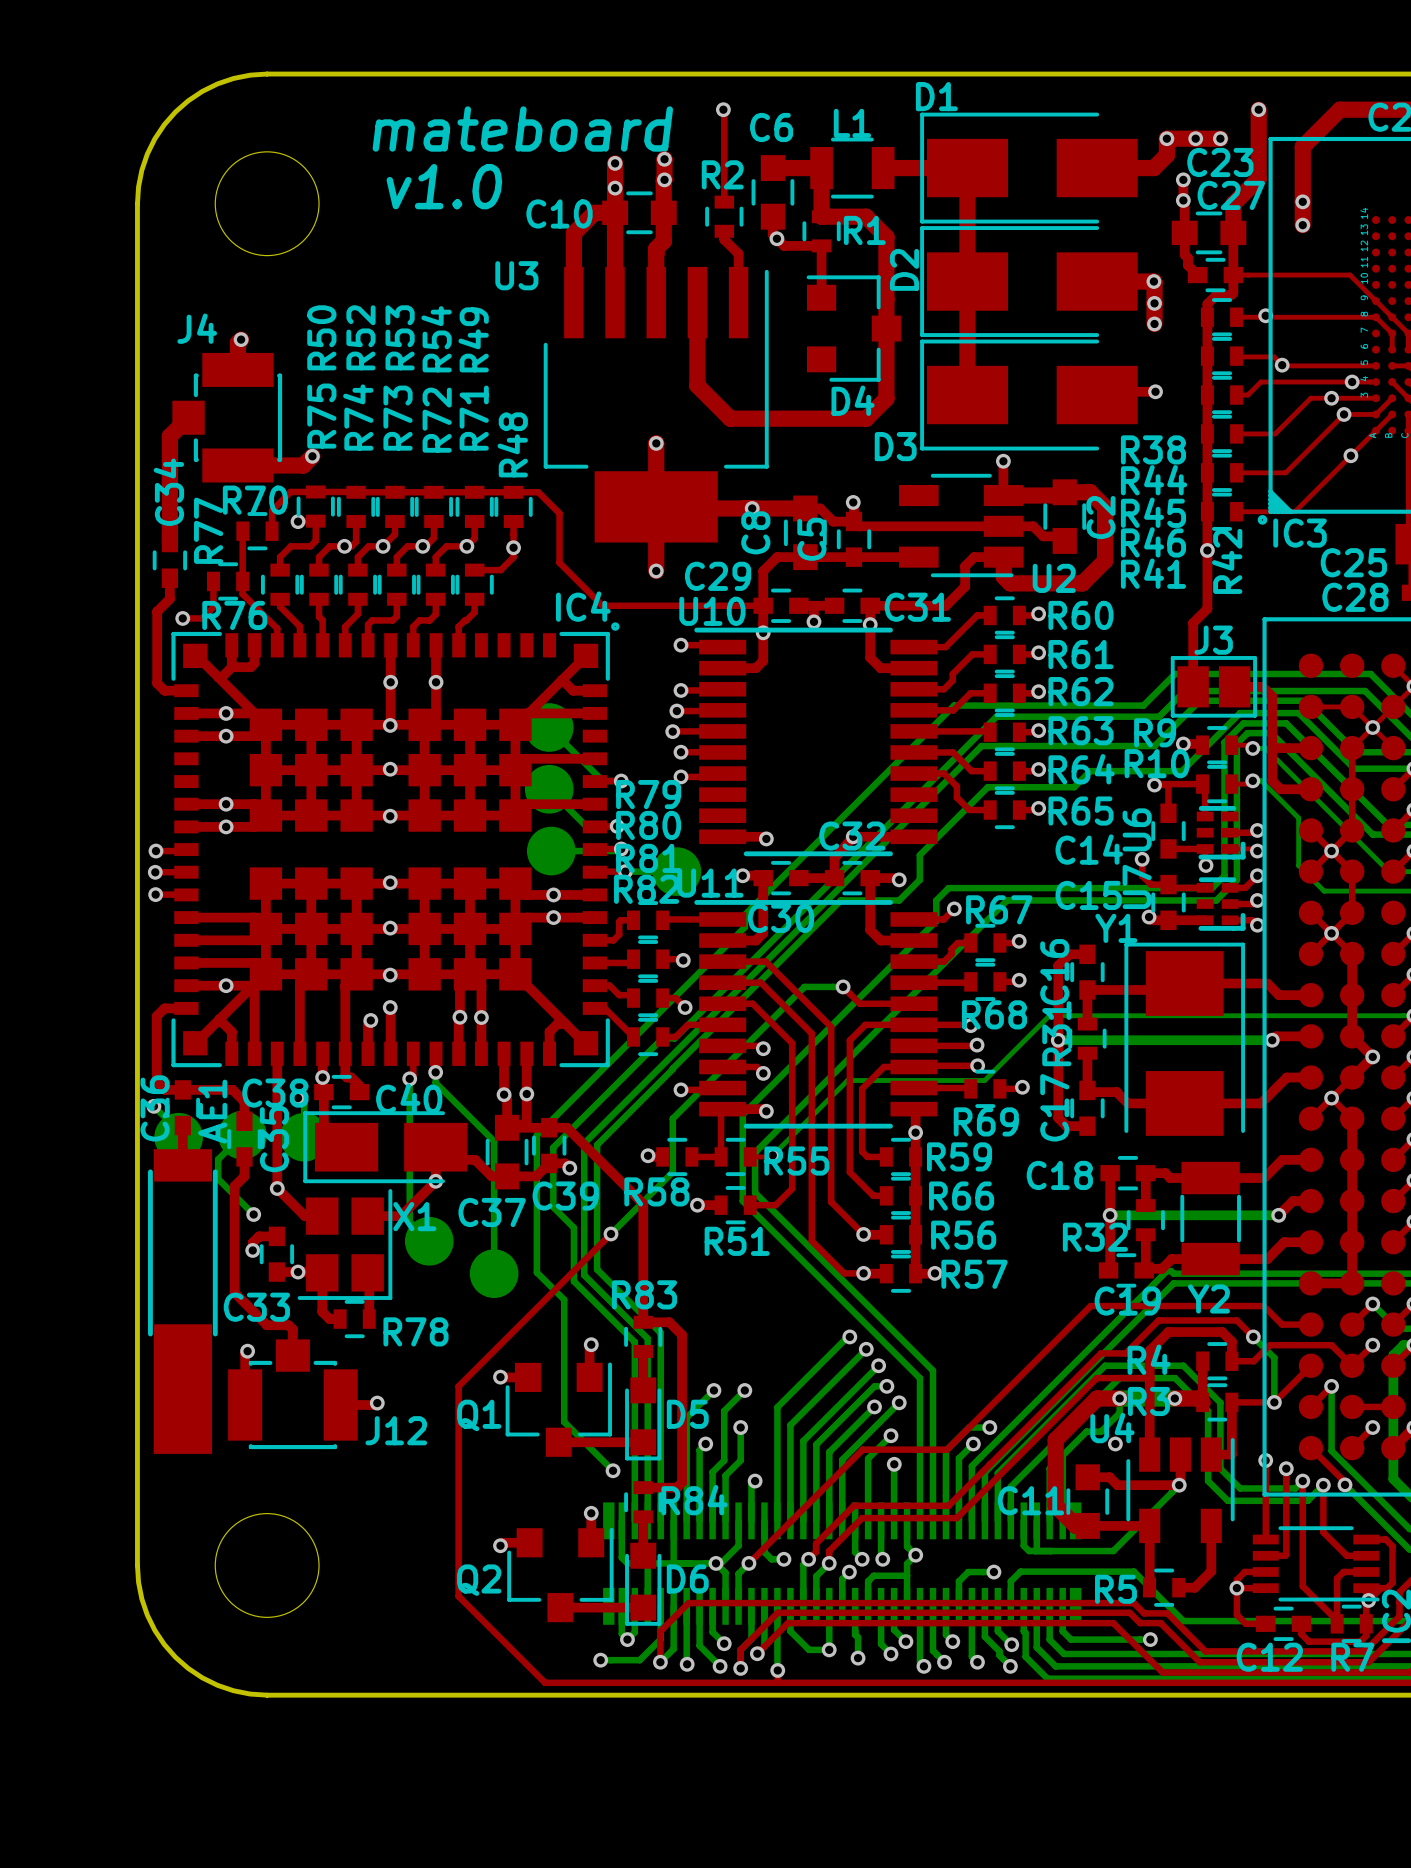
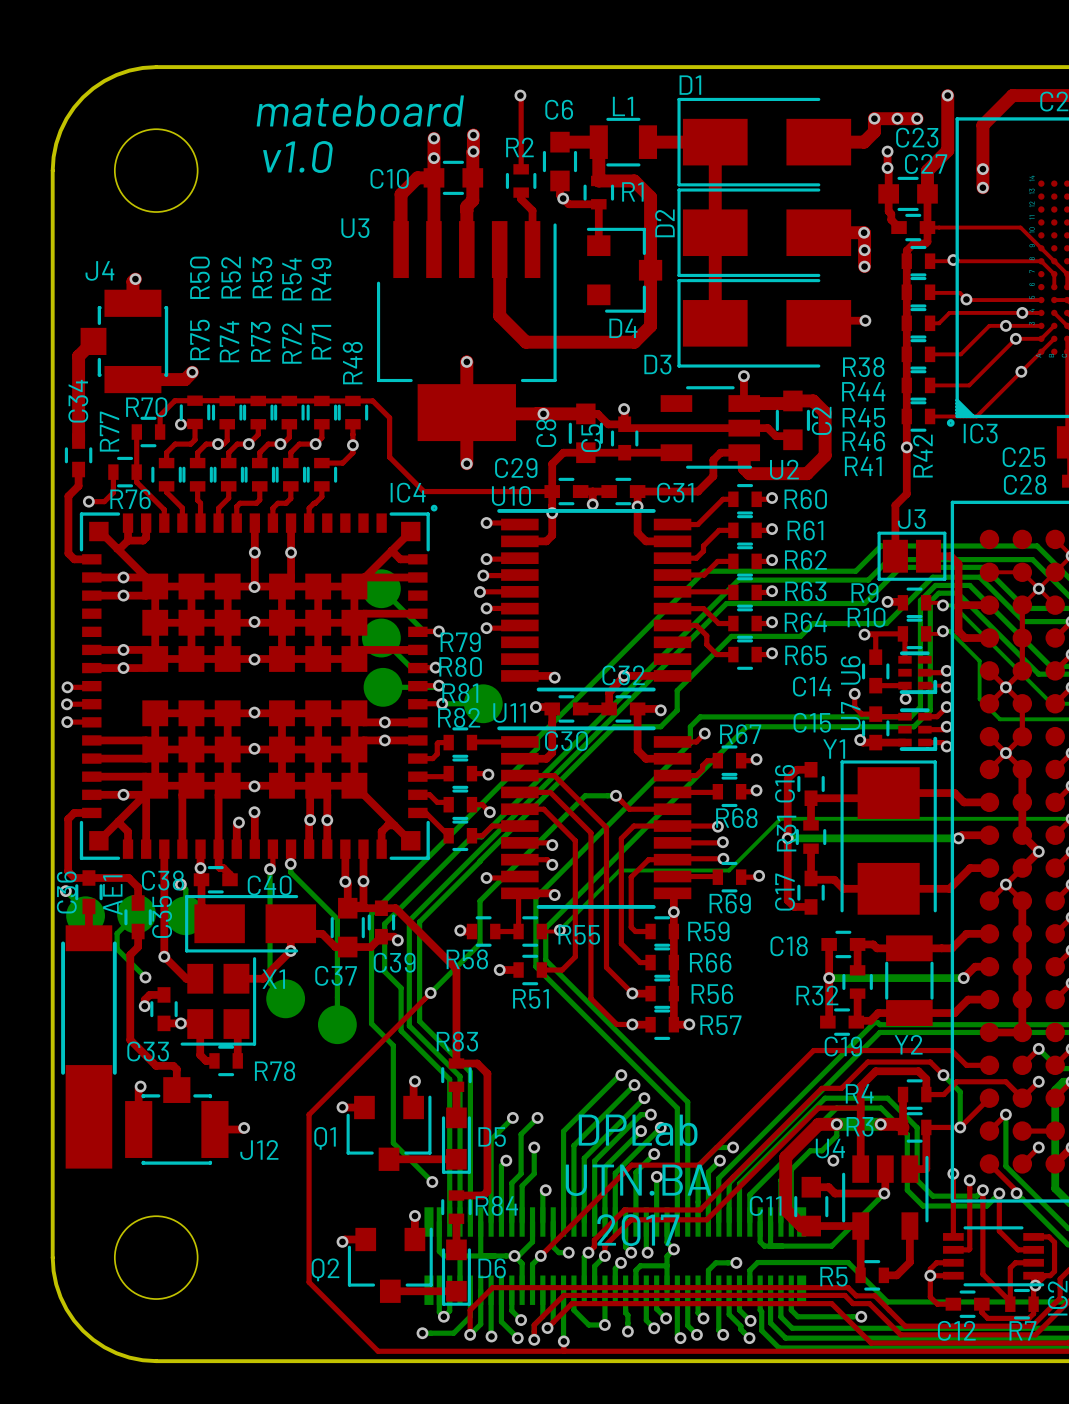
text: none -> DPLab (638, 1130)
text: none -> UTN.BA (638, 1180)
text: none -> 2017 (638, 1230)

